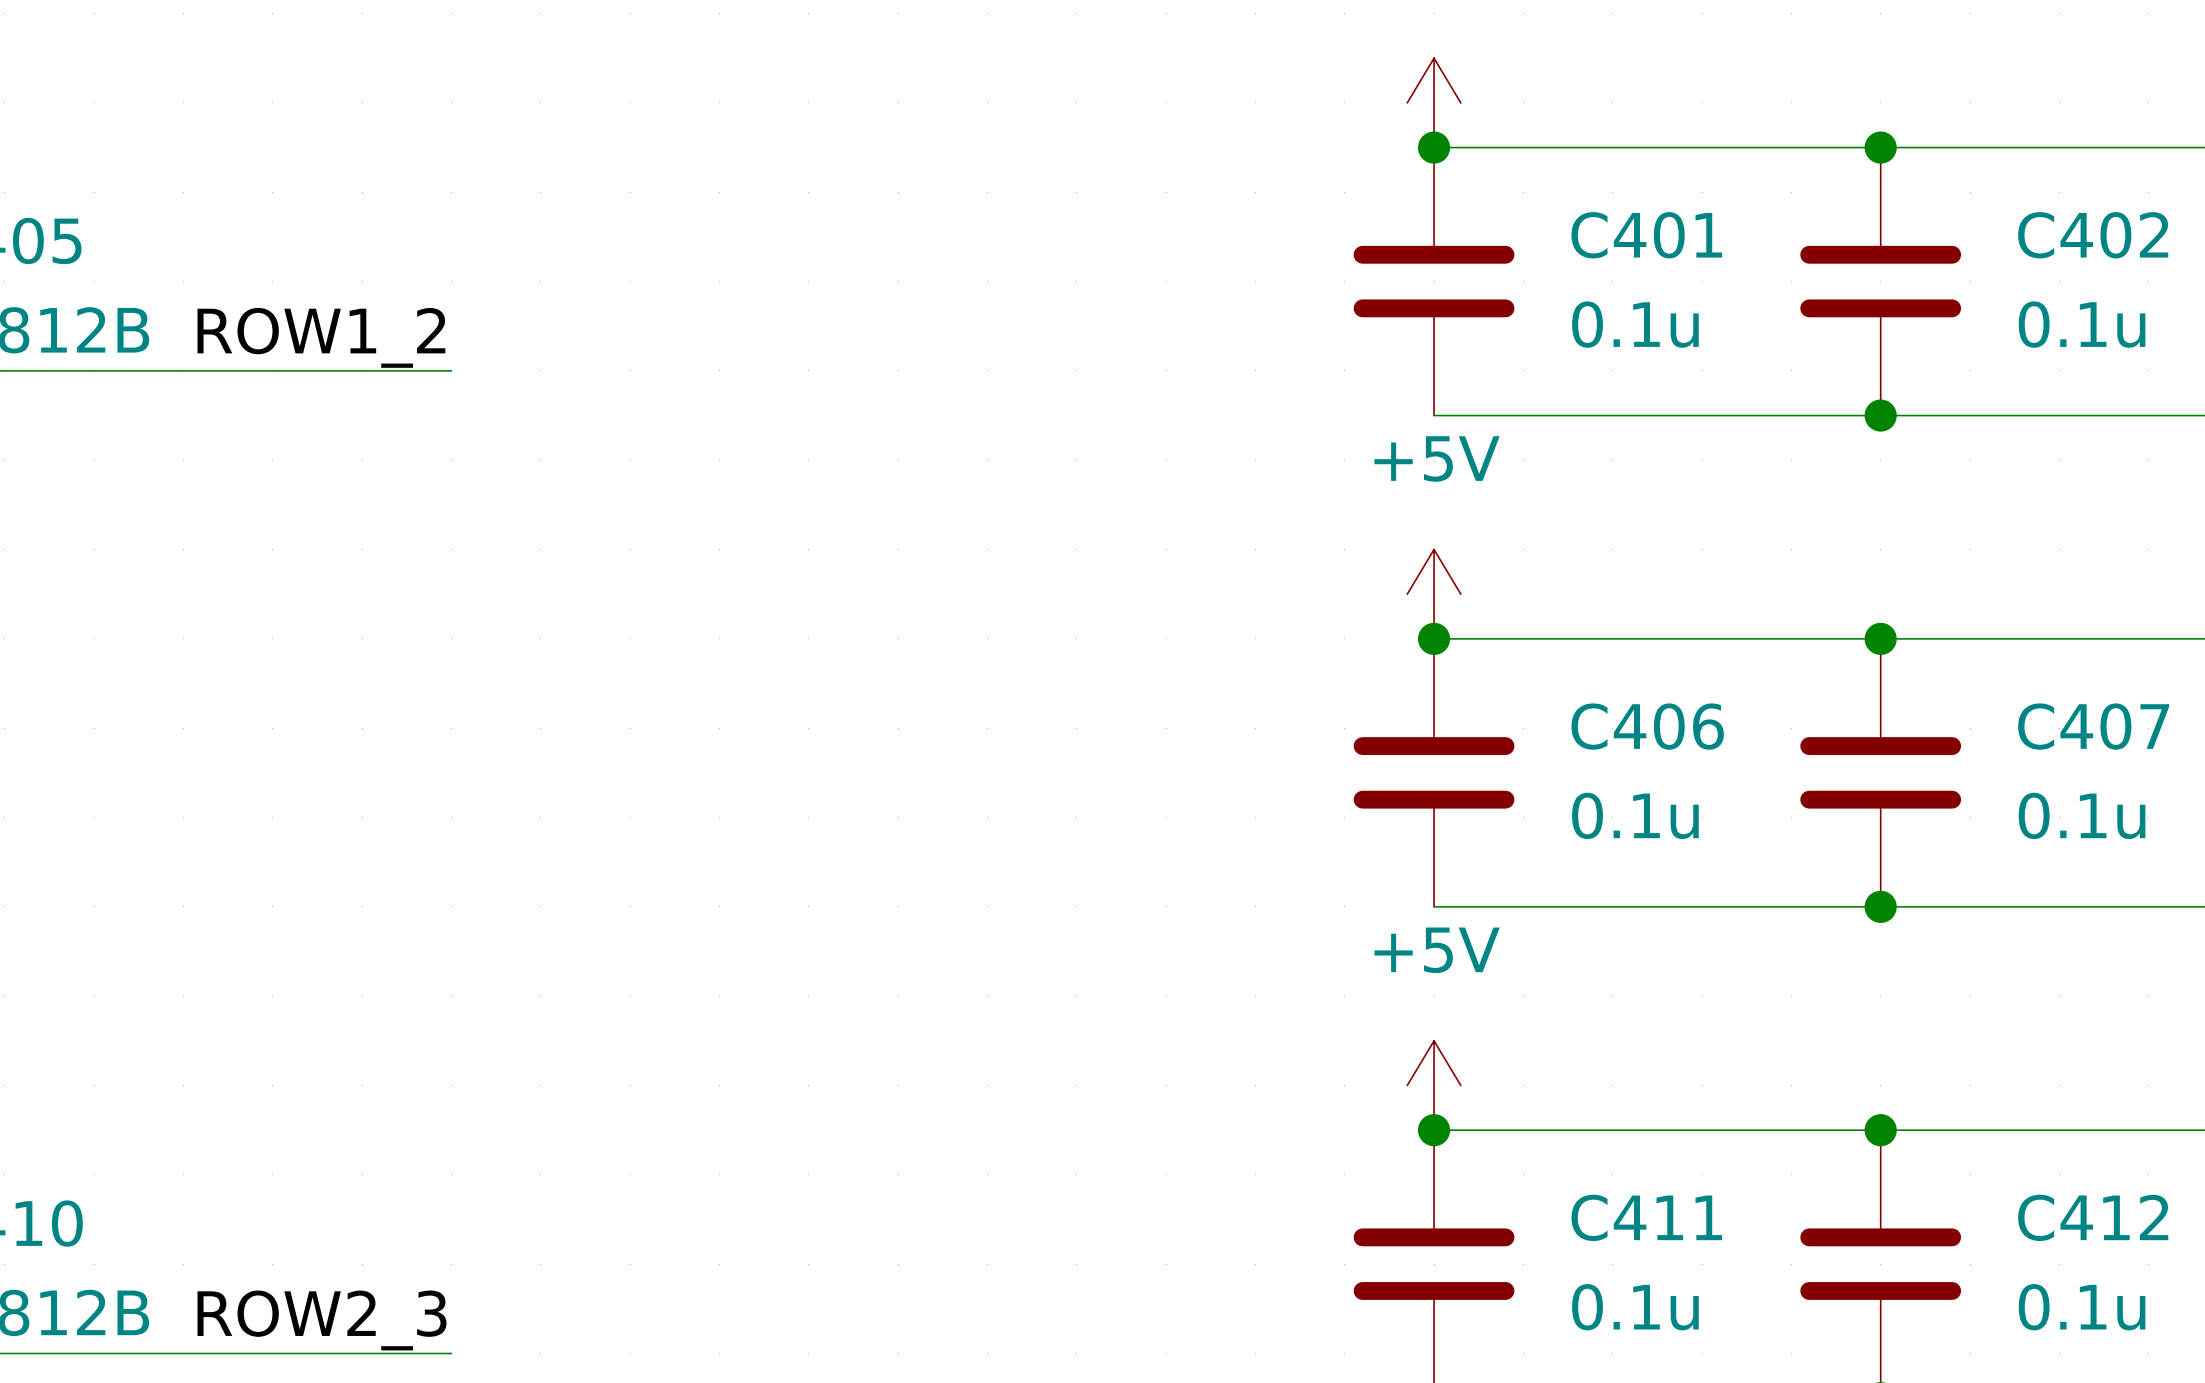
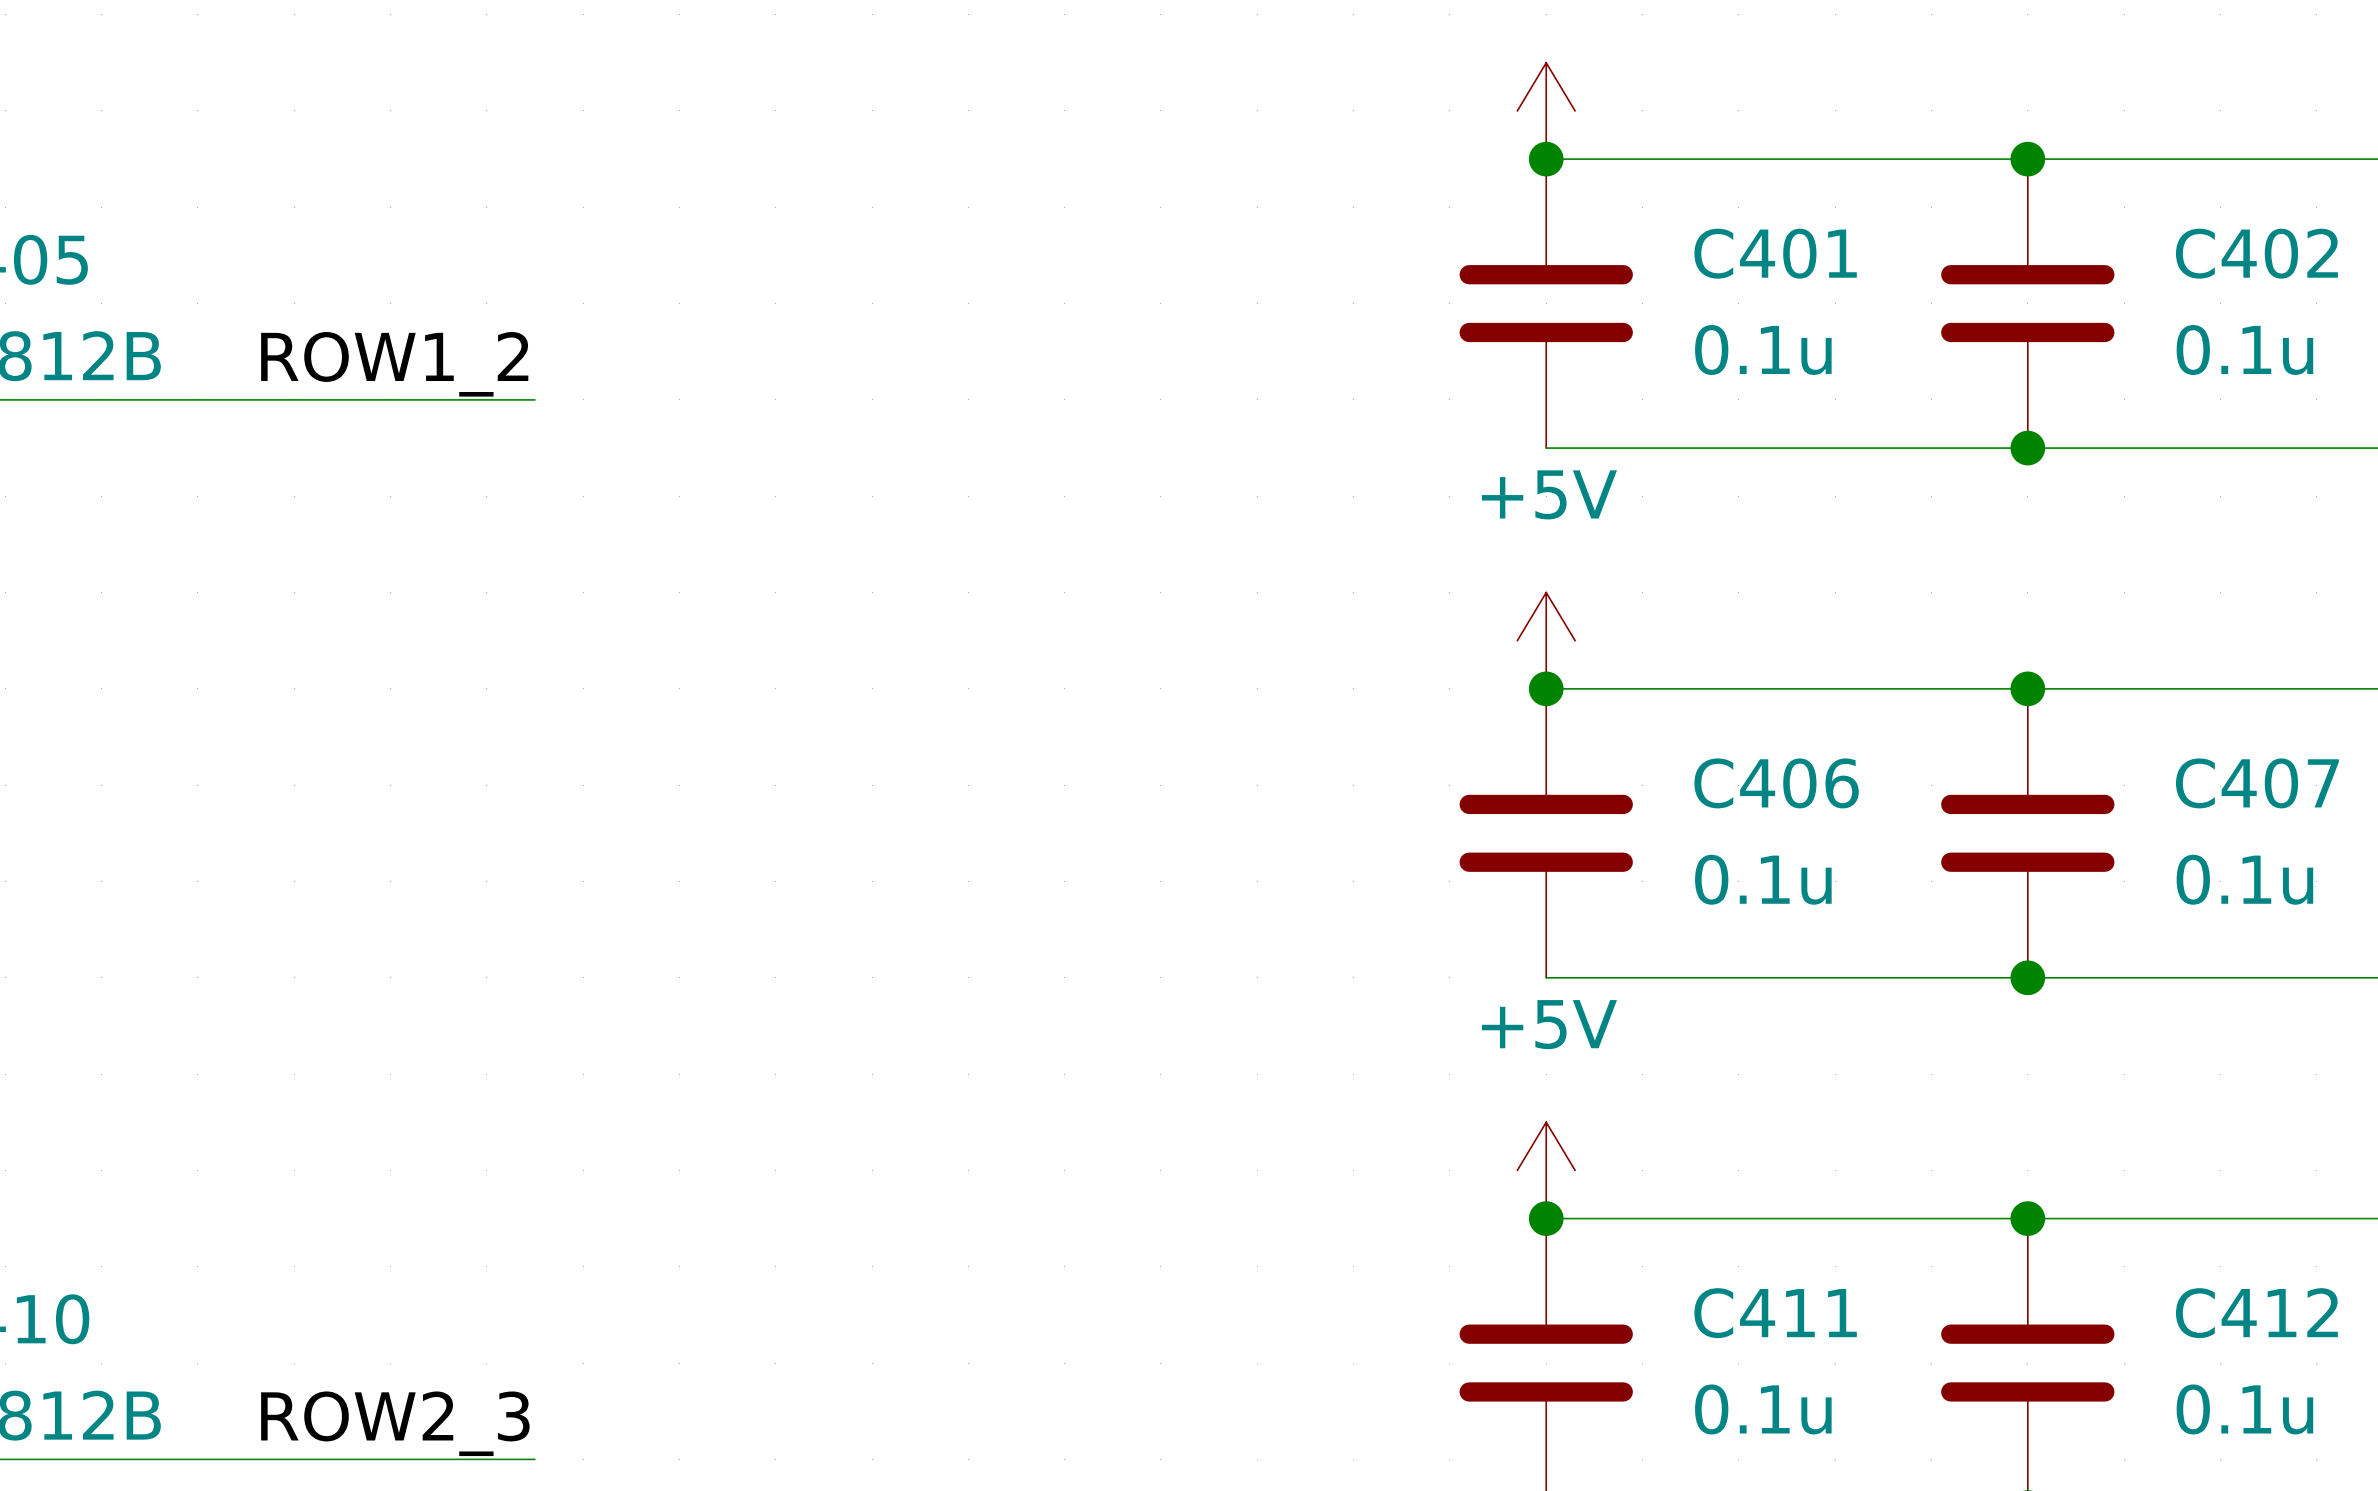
label position: ROW1_2 (321, 337) -> ROW1_2 (394, 364)
wire: none -> (486, 399) (534, 399)
label position: ROW2_3 (322, 1320) -> ROW2_3 (395, 1423)
wire: none -> (486, 1459) (534, 1459)

